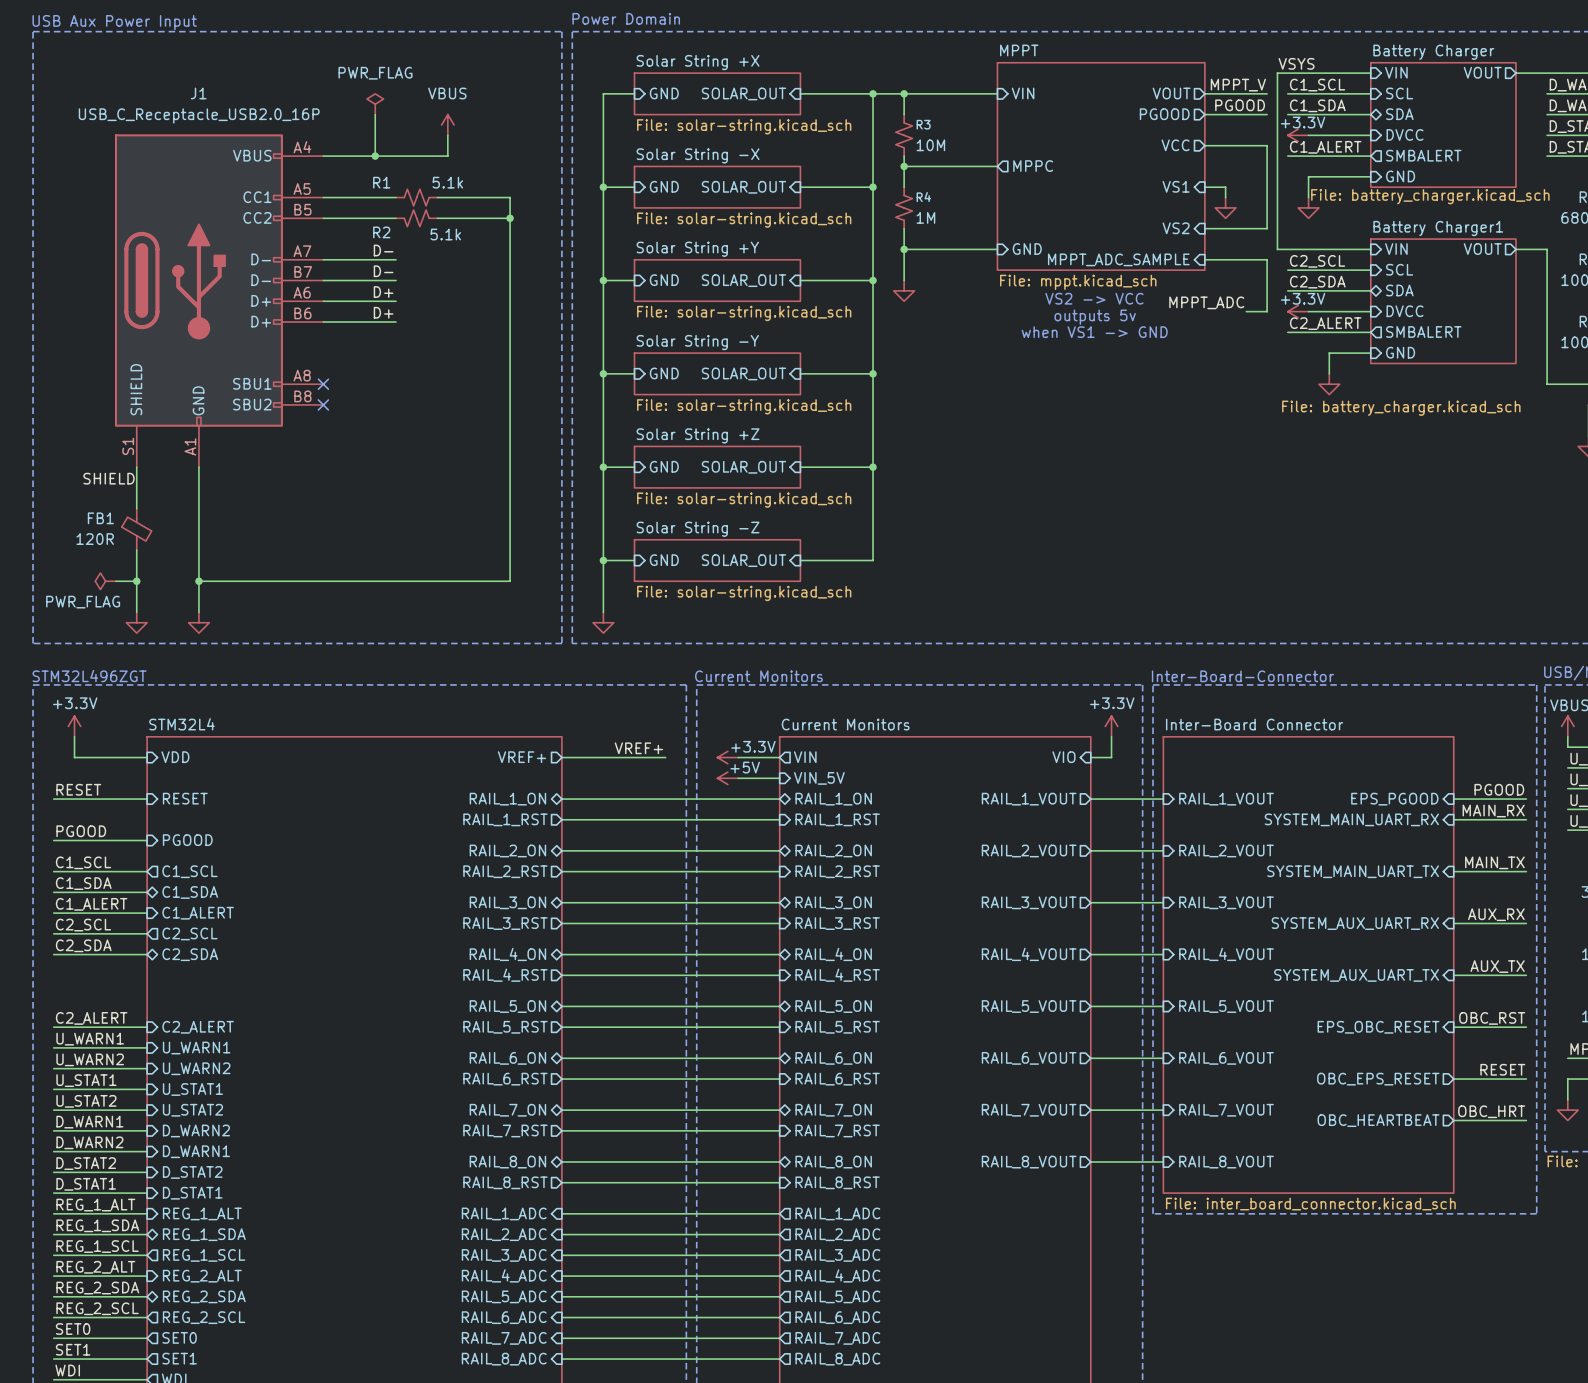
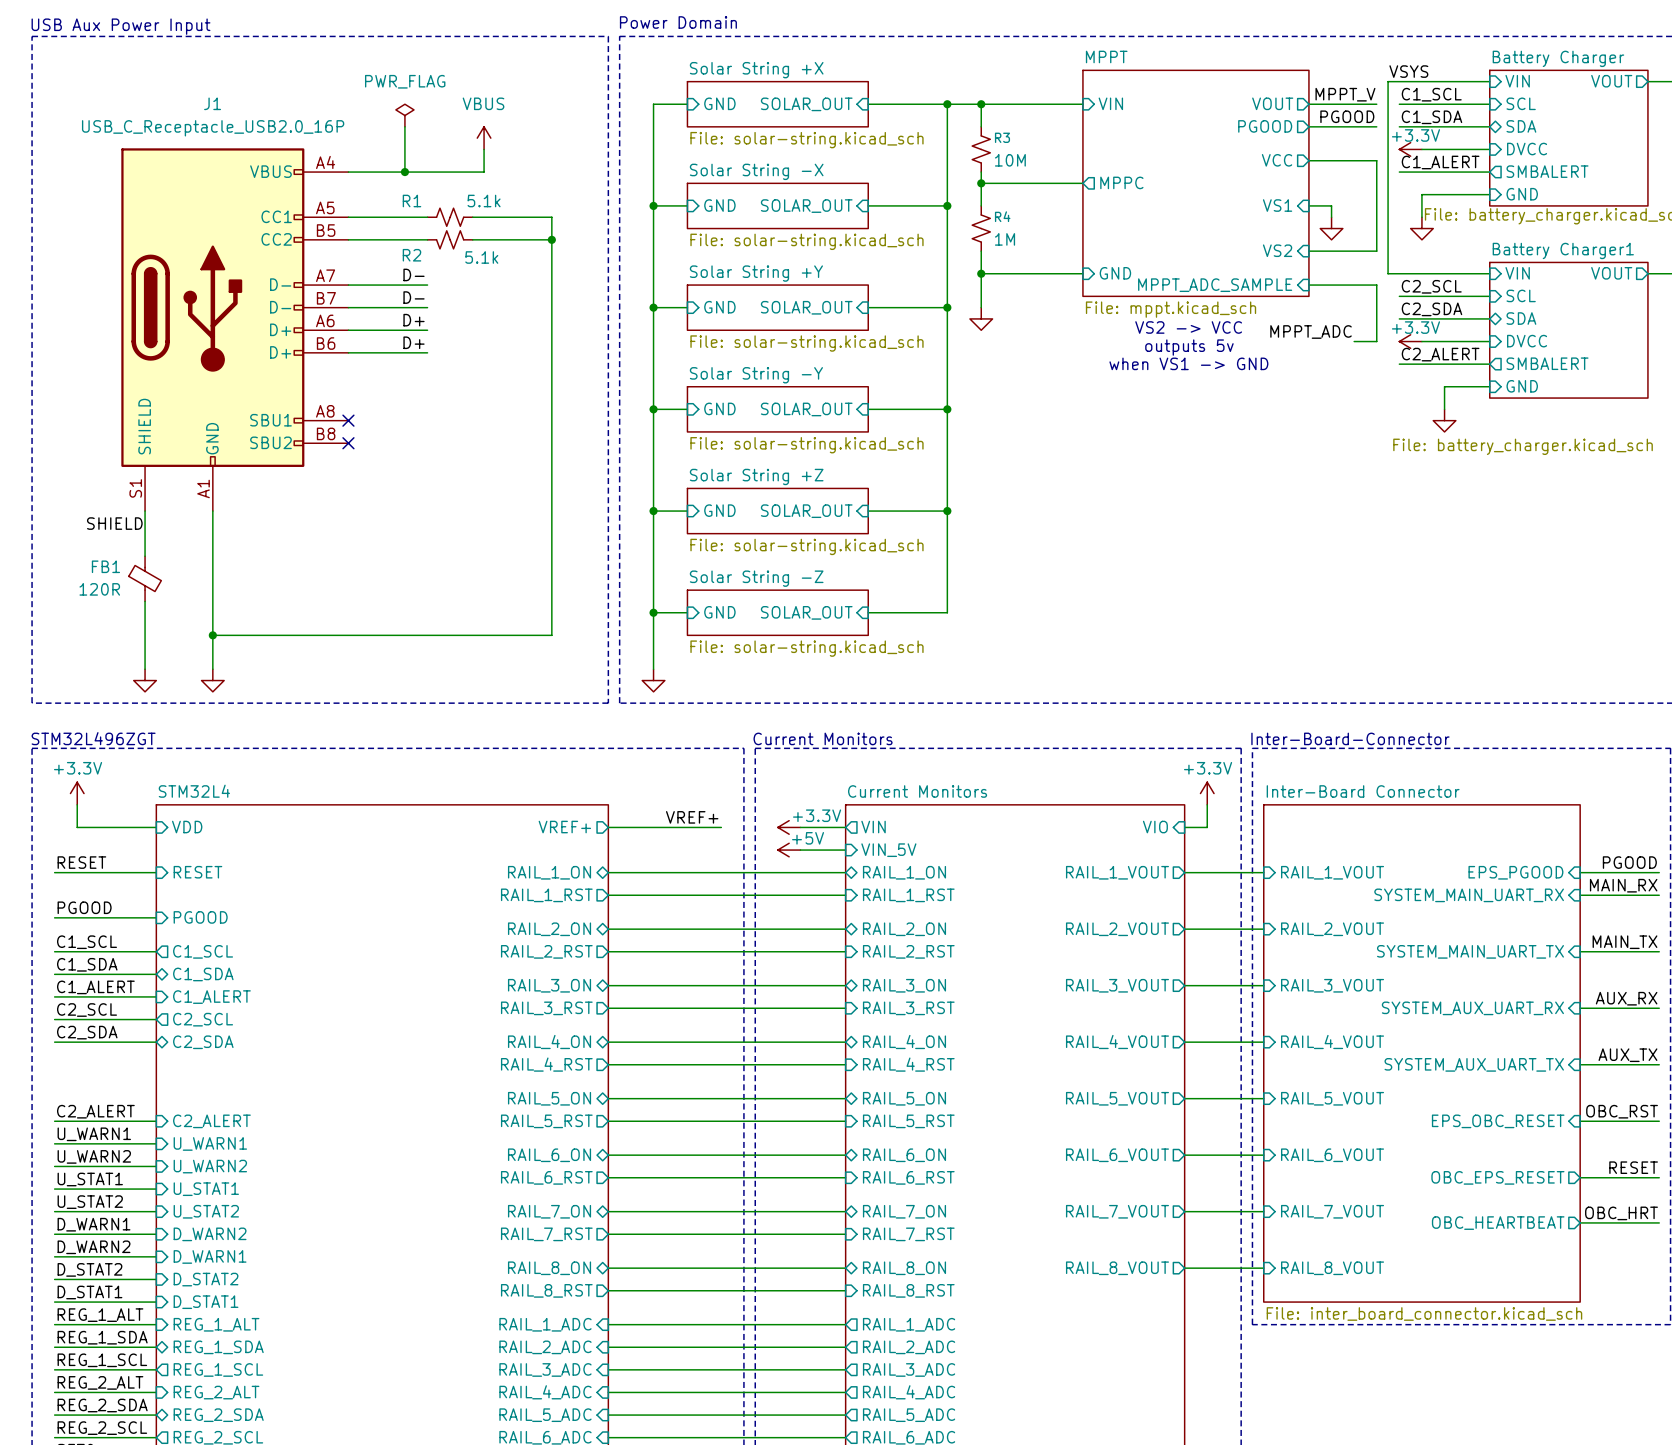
power symbol: PWR_FLAG (105, 581) -> none
wire: (116, 581) (136, 581) -> none
junction: (136, 581) -> none

